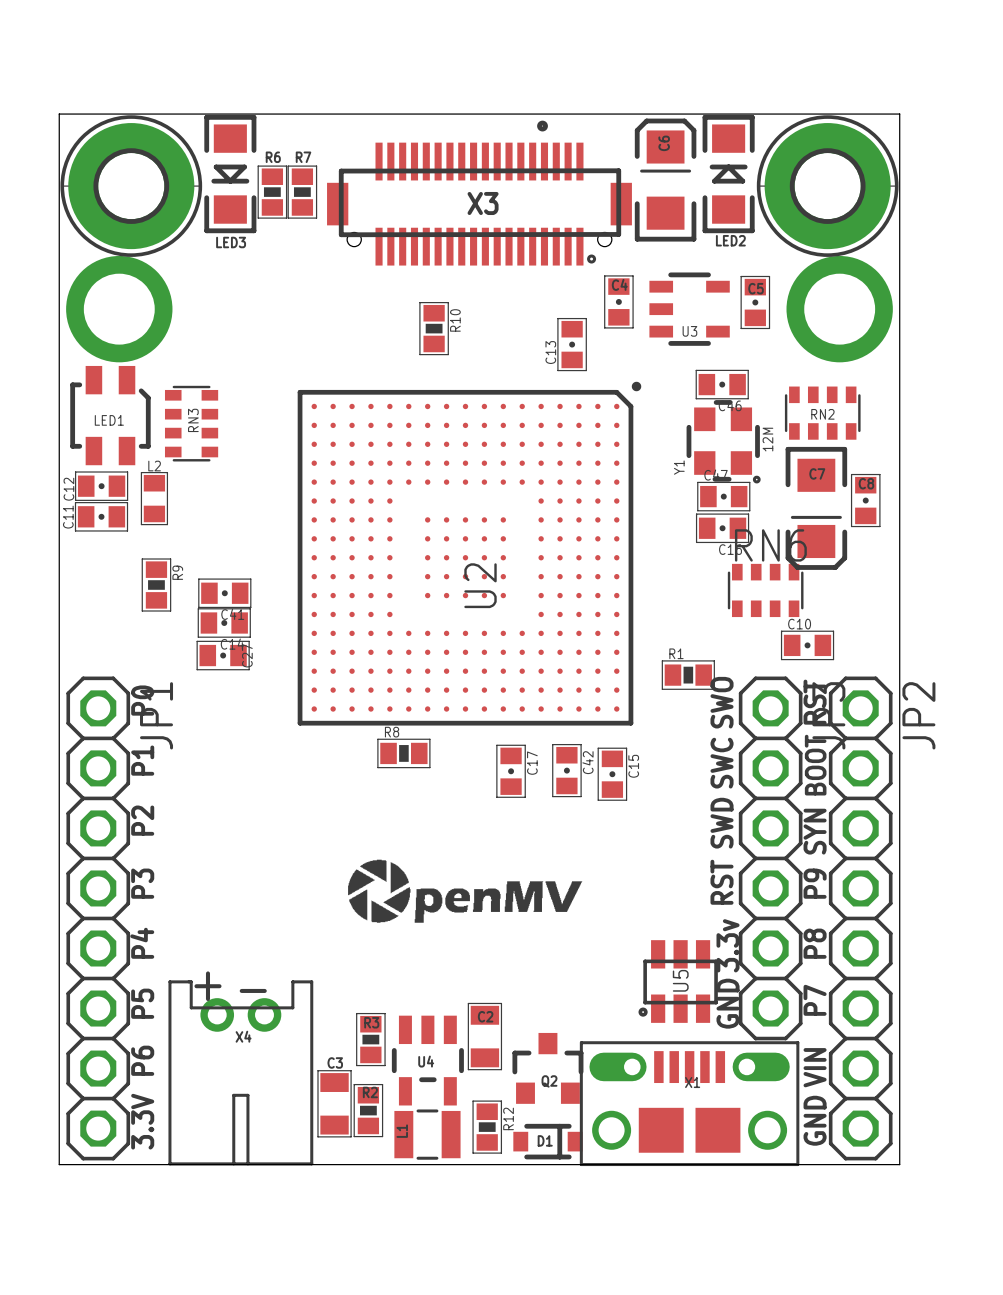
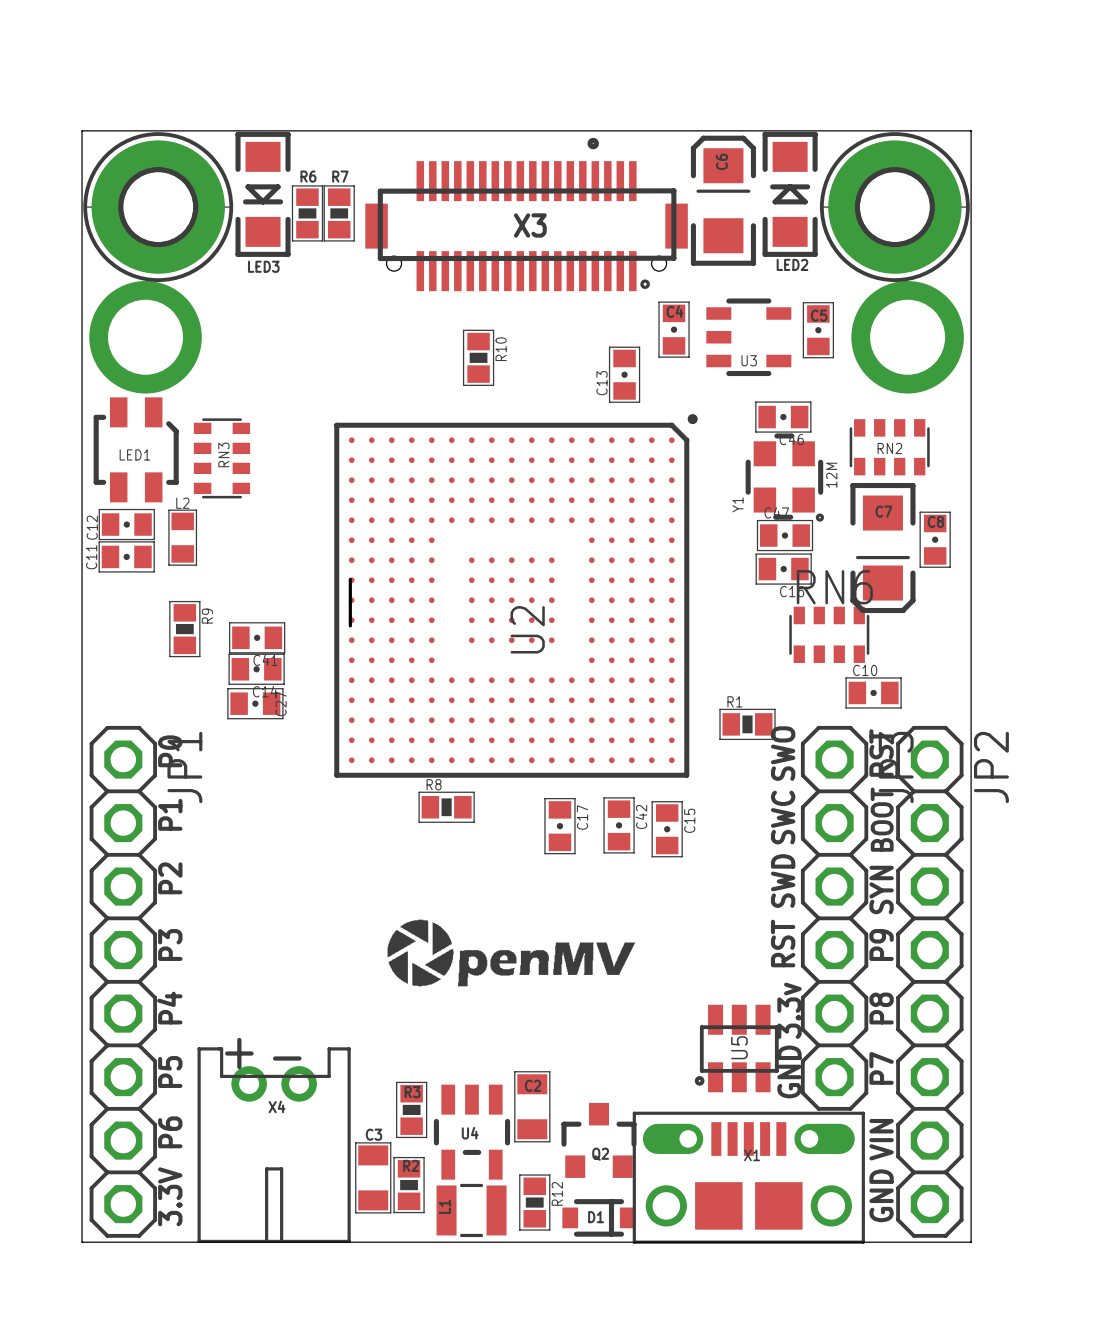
board edge: none -> (350, 579) (350, 625)

